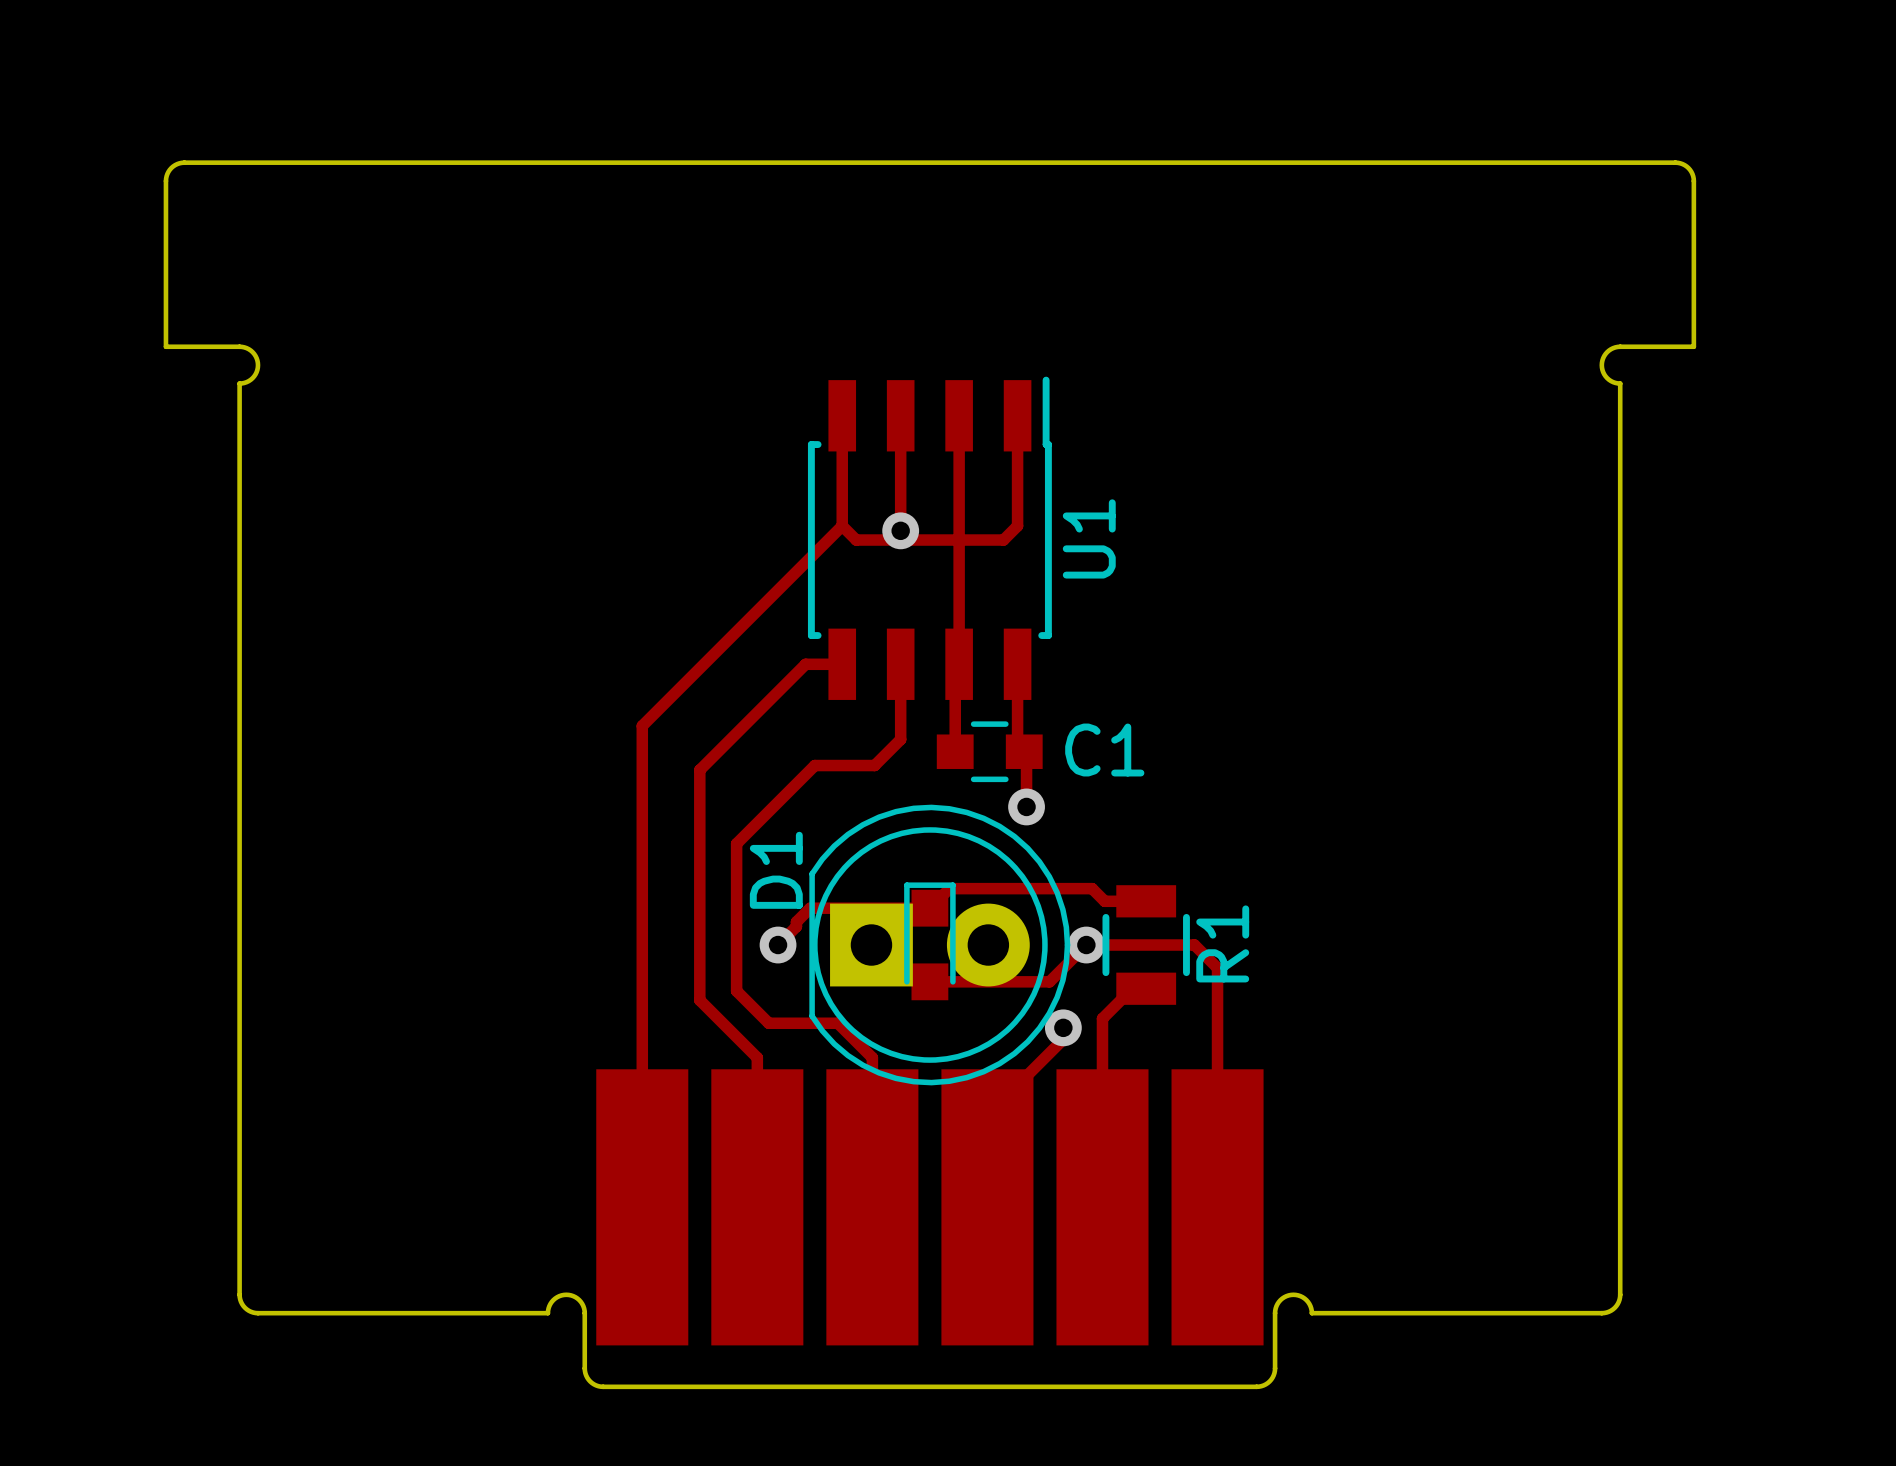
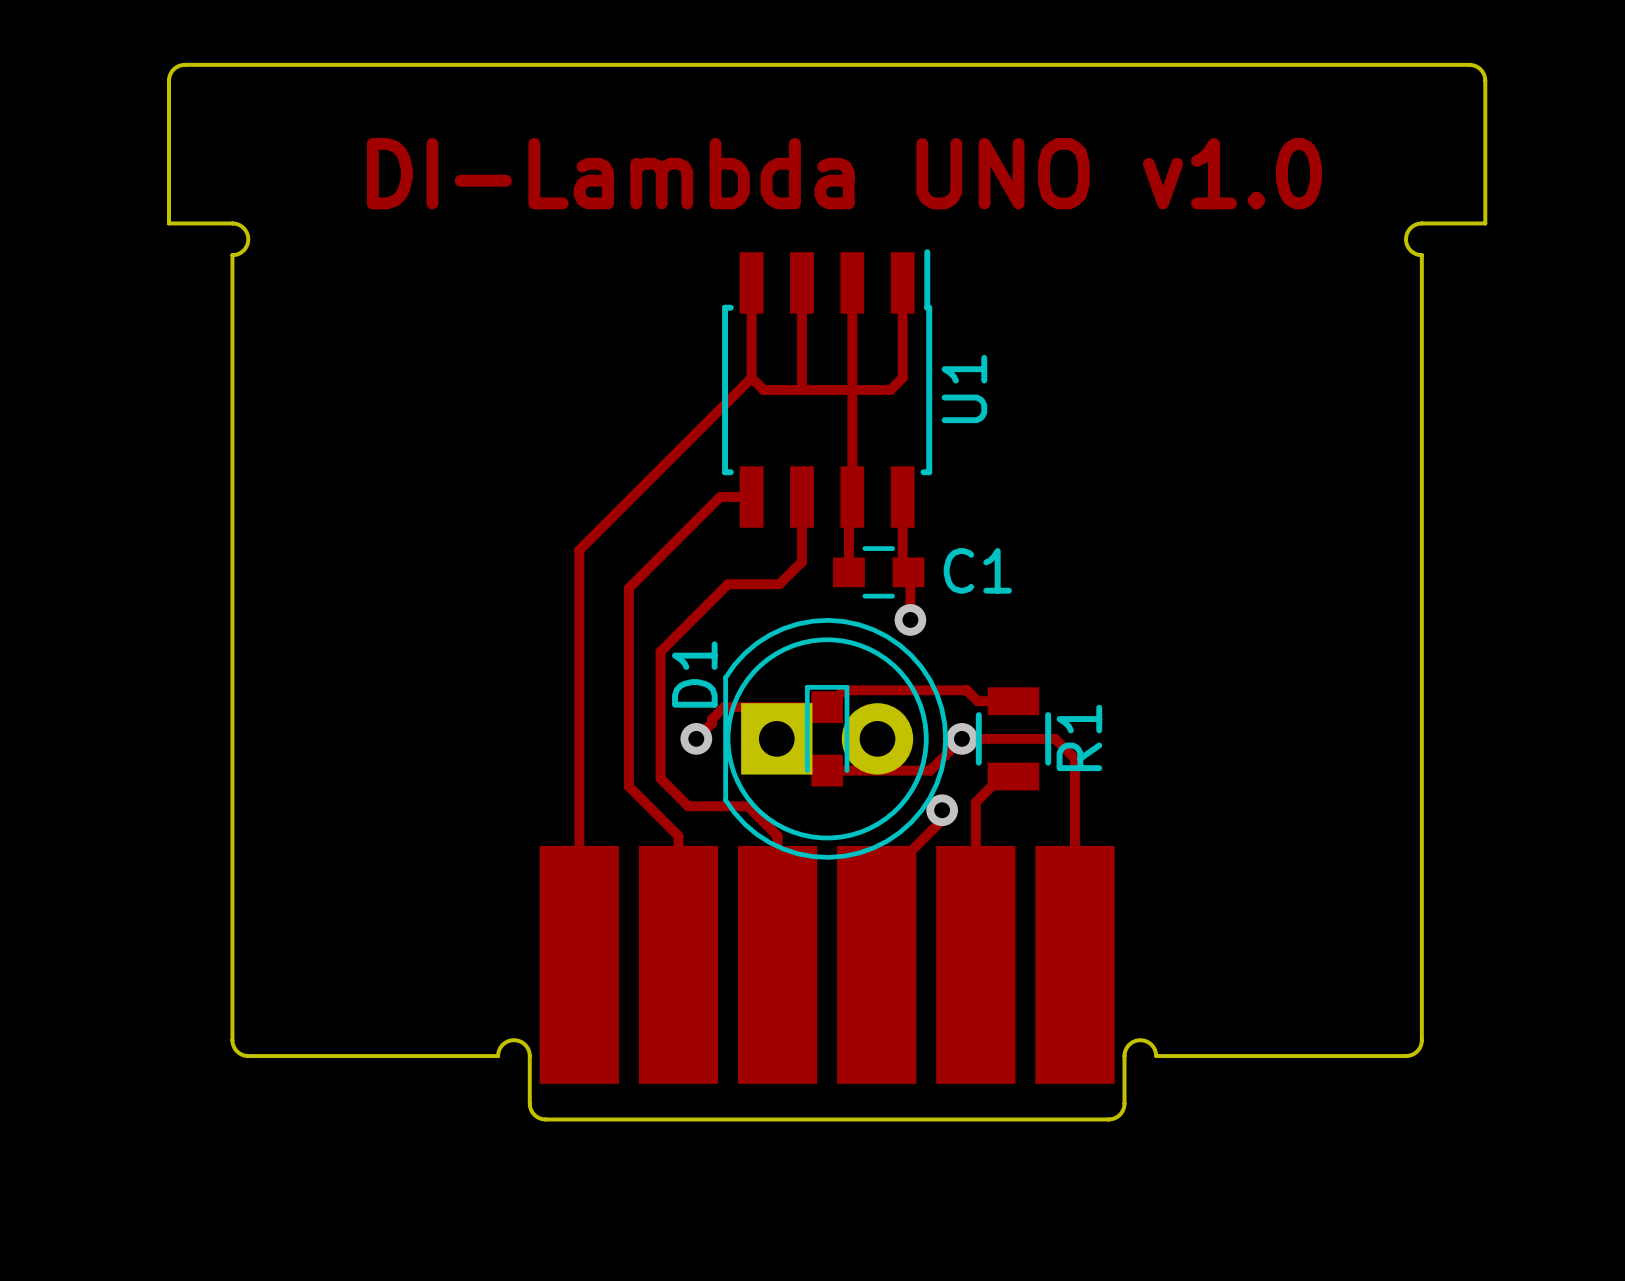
text: none -> DI-Lambda UNO v1.0 (844, 173)
via: (900, 530) -> none

